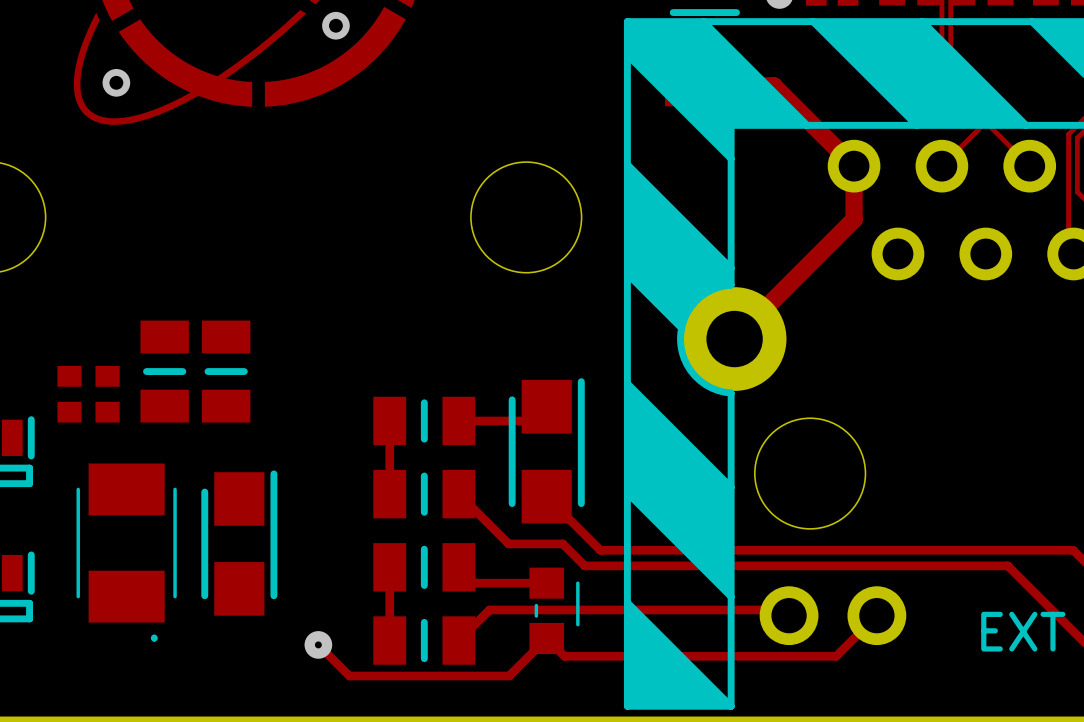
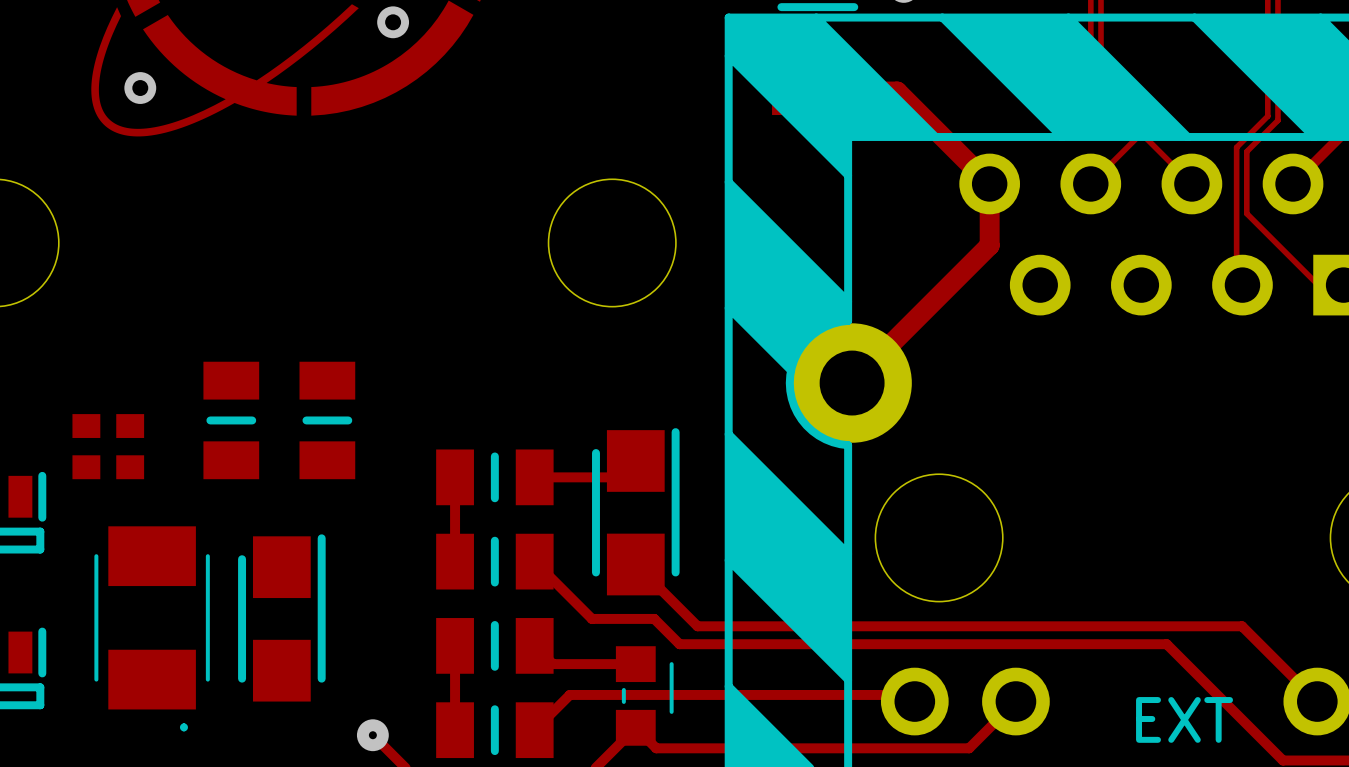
part: (164, 371) -> none
part: none -> (231, 420)
part: (226, 371) -> none
part: none -> (327, 420)

